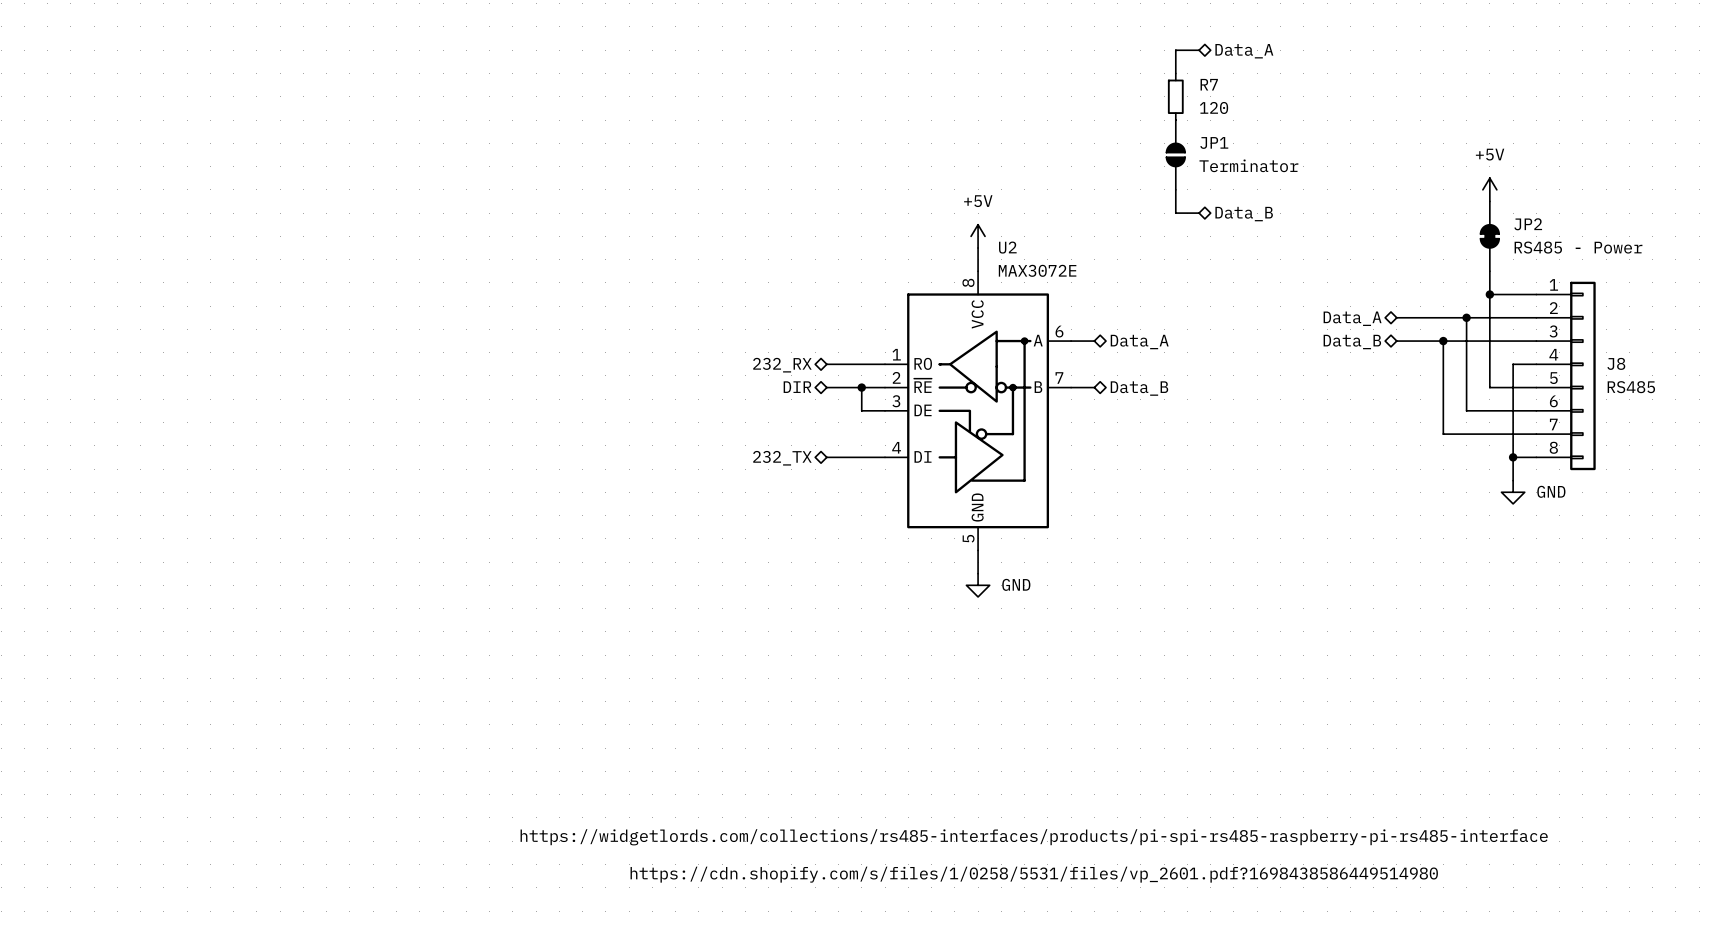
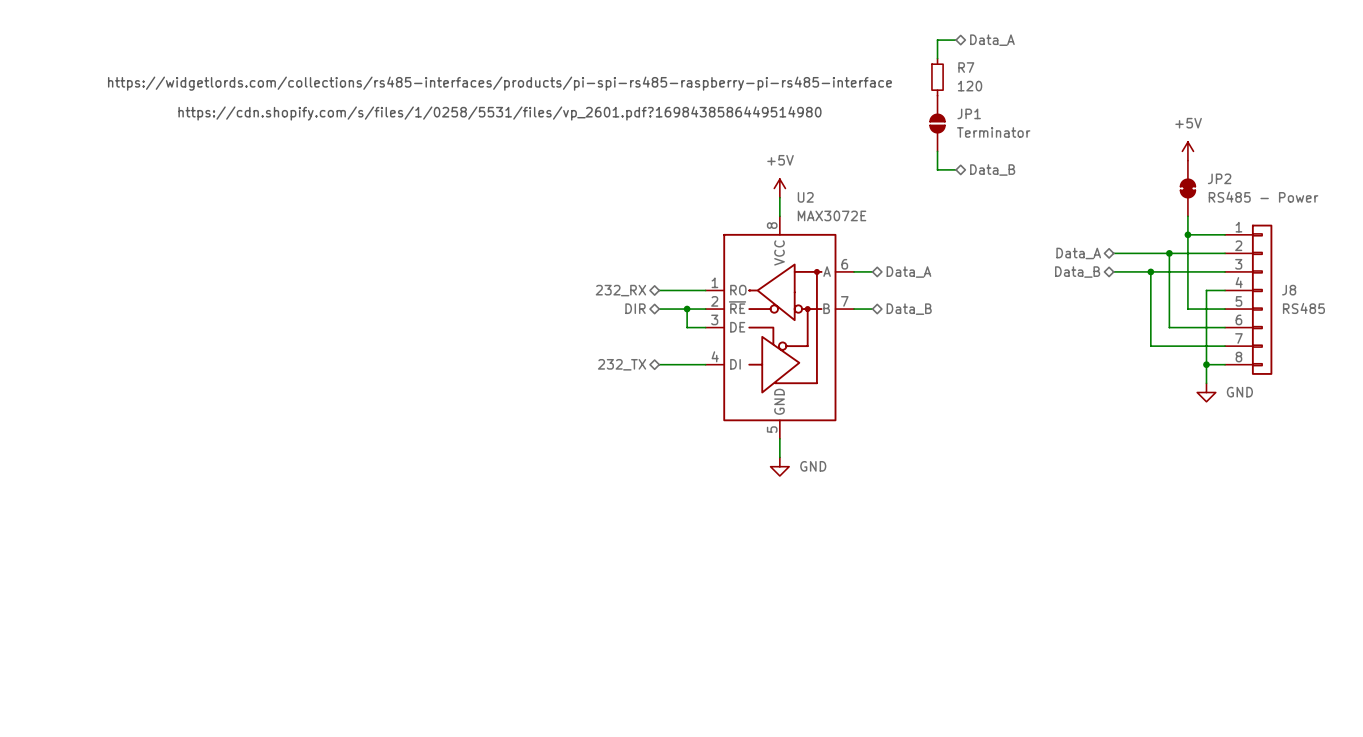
text: none -> https://widgetlords.com/collections/rs485-interfaces/products/pi-spi-rs485-raspberry-pi-rs485-interface (499, 83)
text: none -> https://cdn.shopify.com/s/files/1/0258/5531/files/vp_2601.pdf?1698438586449514980 (499, 113)
text: https://widgetlords.com/collections/rs485-interfaces/products/pi-spi-rs485-raspberry-pi-rs485-interface (1034, 837) -> none
text: https://cdn.shopify.com/s/files/1/0258/5531/files/vp_2601.pdf?1698438586449514980 (1034, 874) -> none

